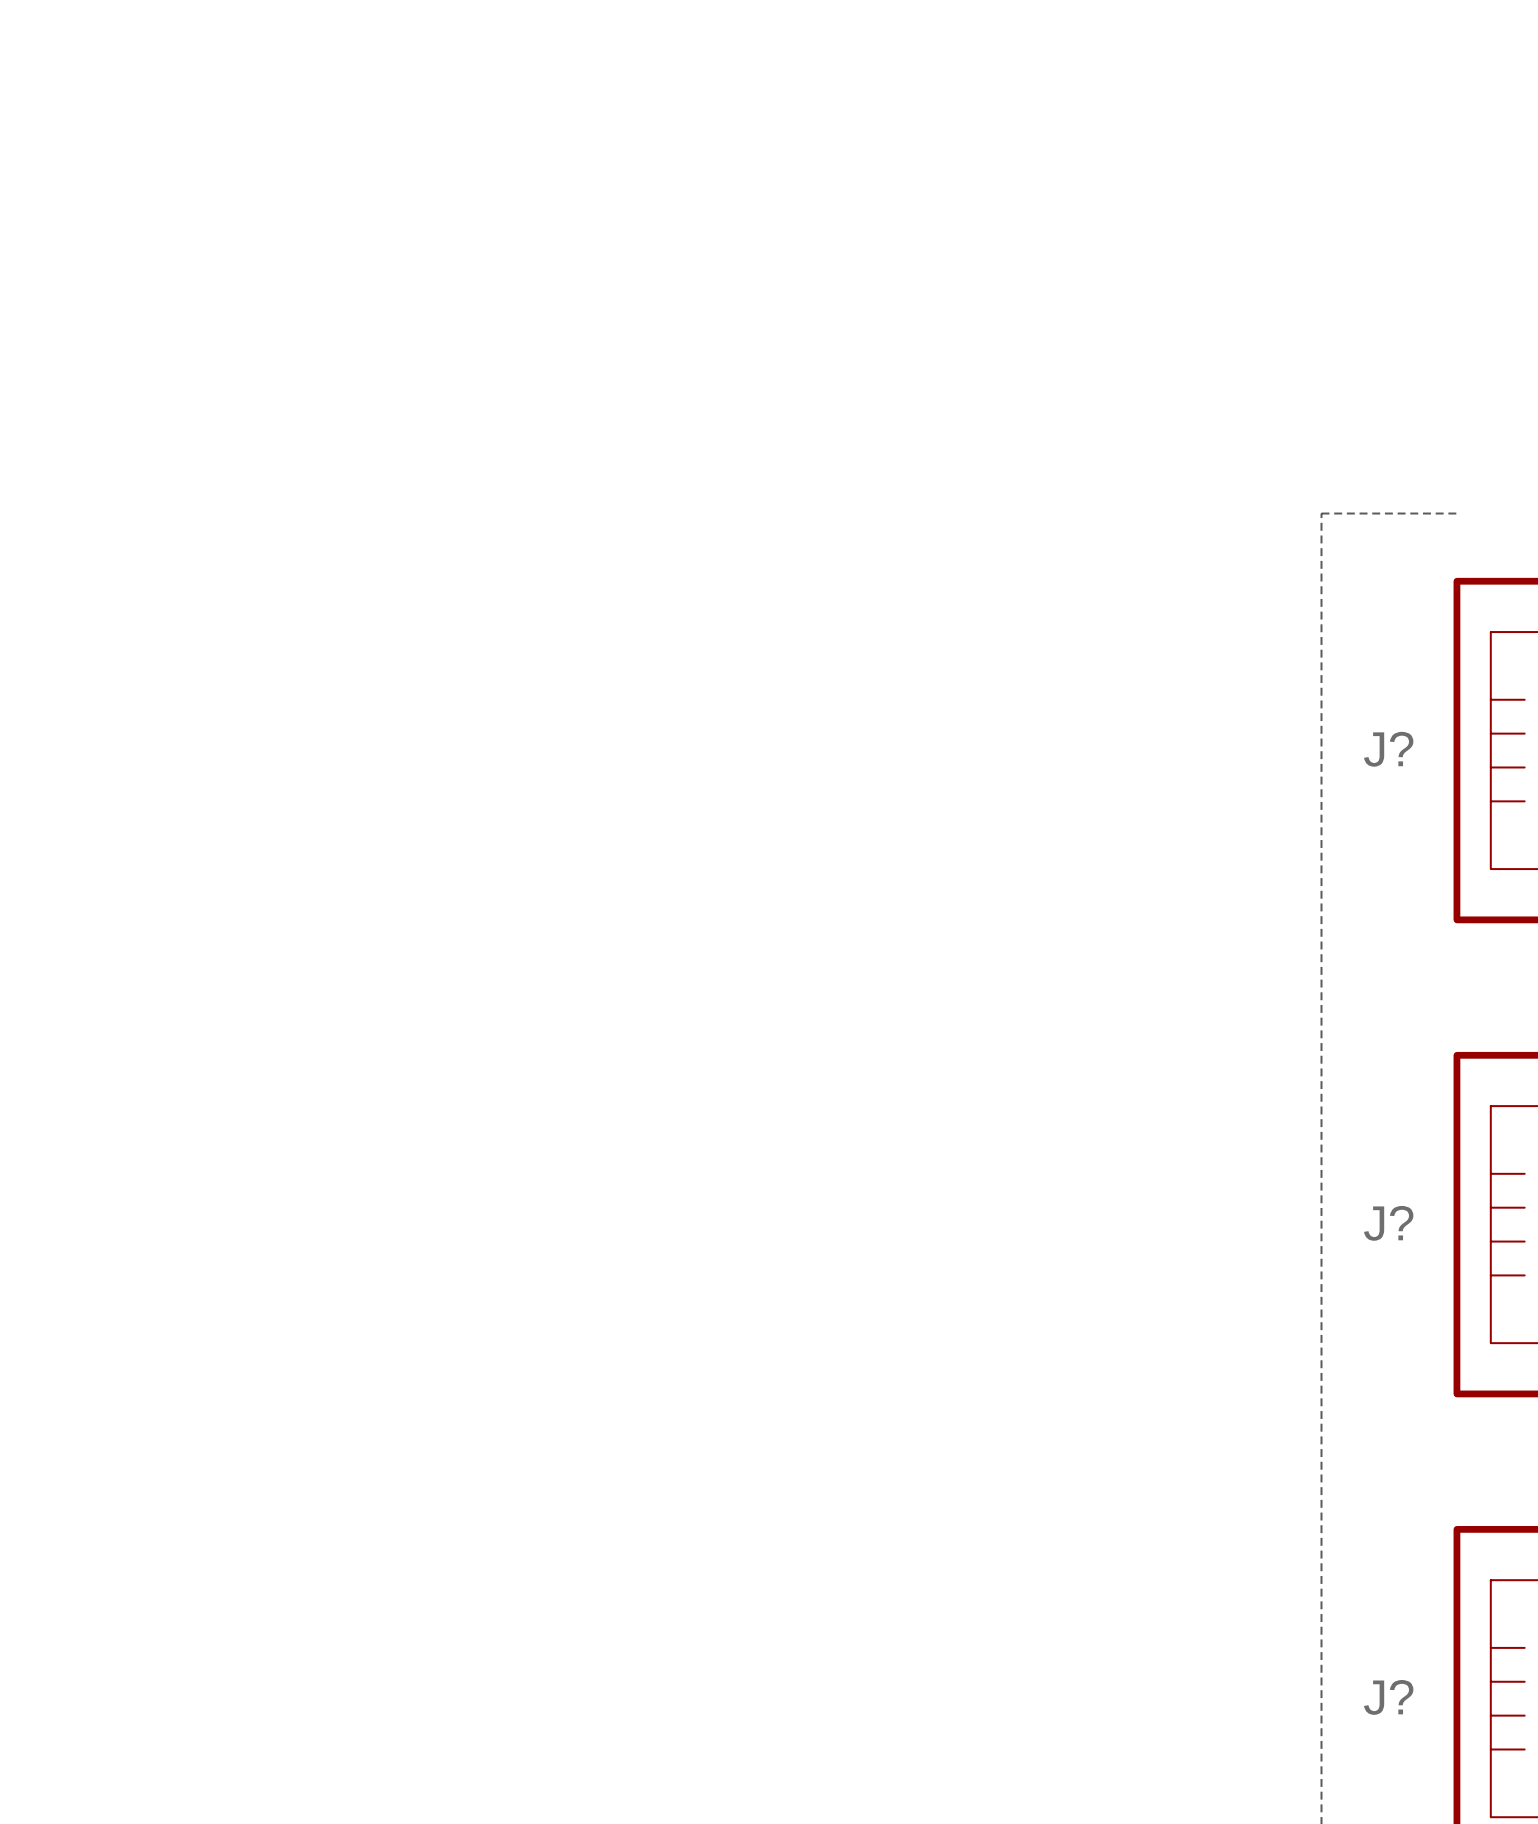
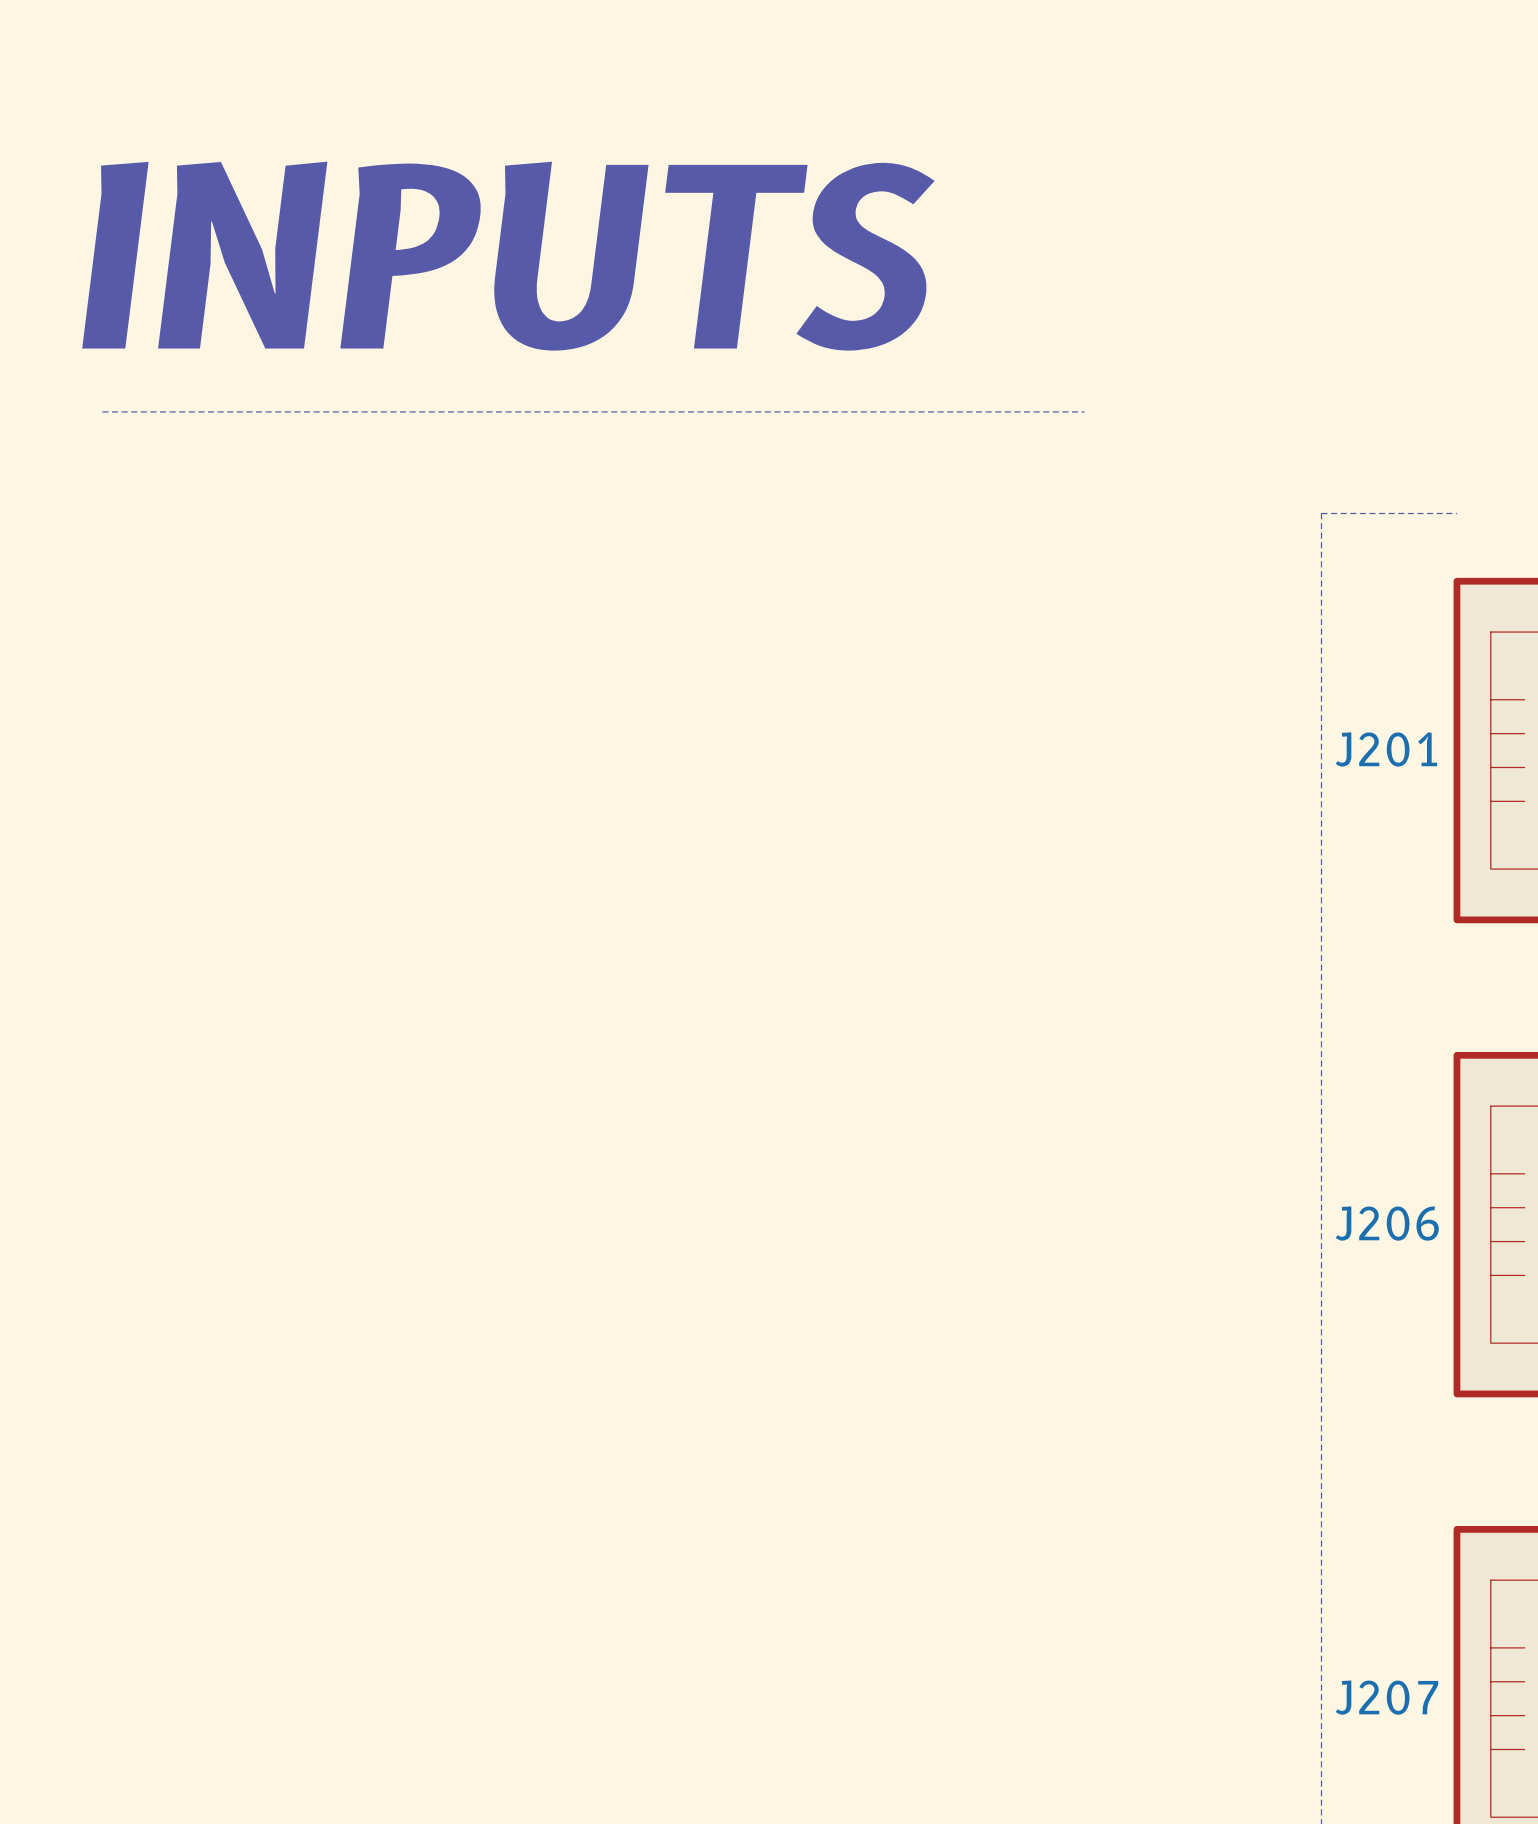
text: none -> INPUTS (508, 256)
line: none -> (102, 411) (1084, 411)
J? name: J? (1388, 749) -> J201 (1386, 749)
J? name: J? (1388, 1223) -> J206 (1387, 1223)
J? name: J? (1388, 1697) -> J207 (1386, 1697)

